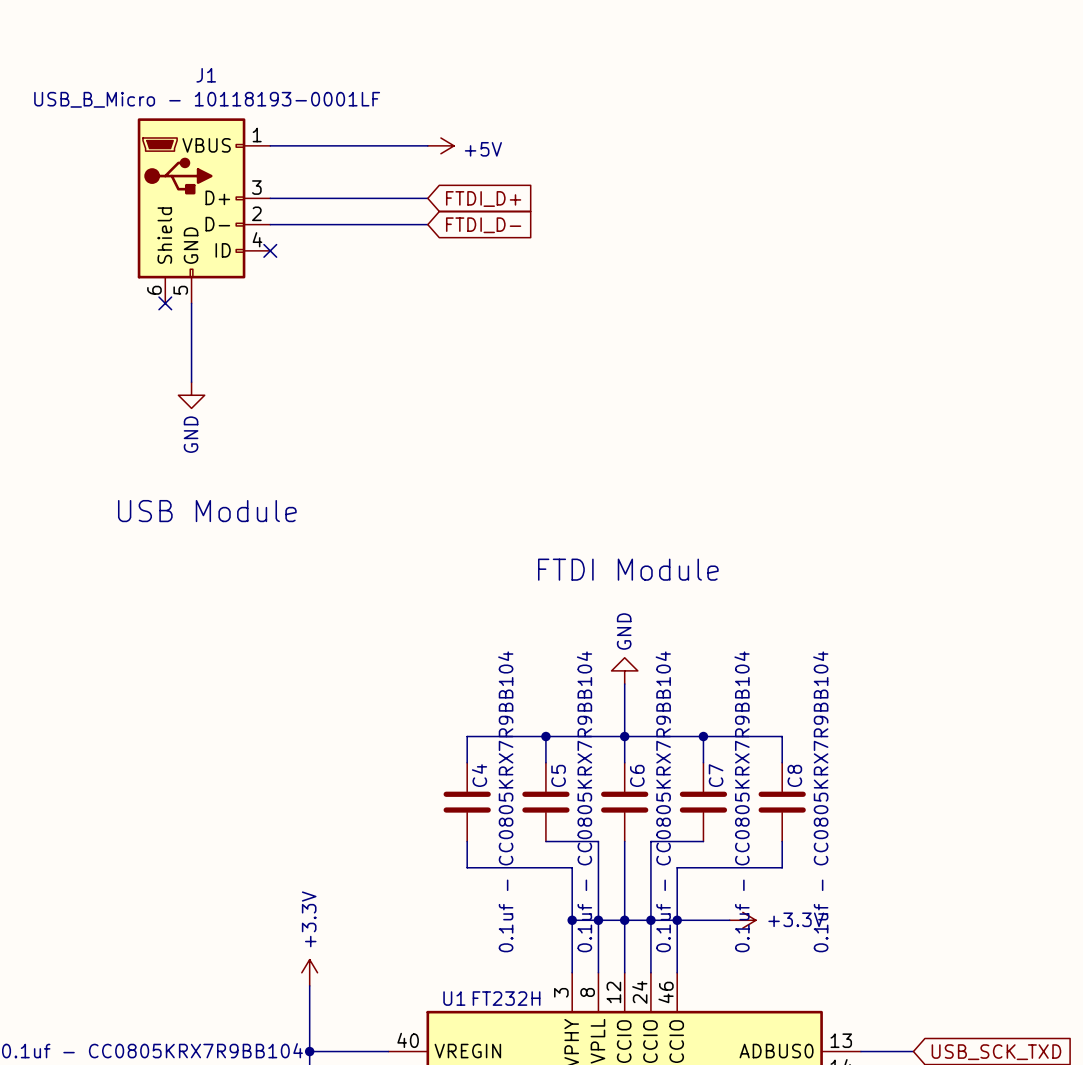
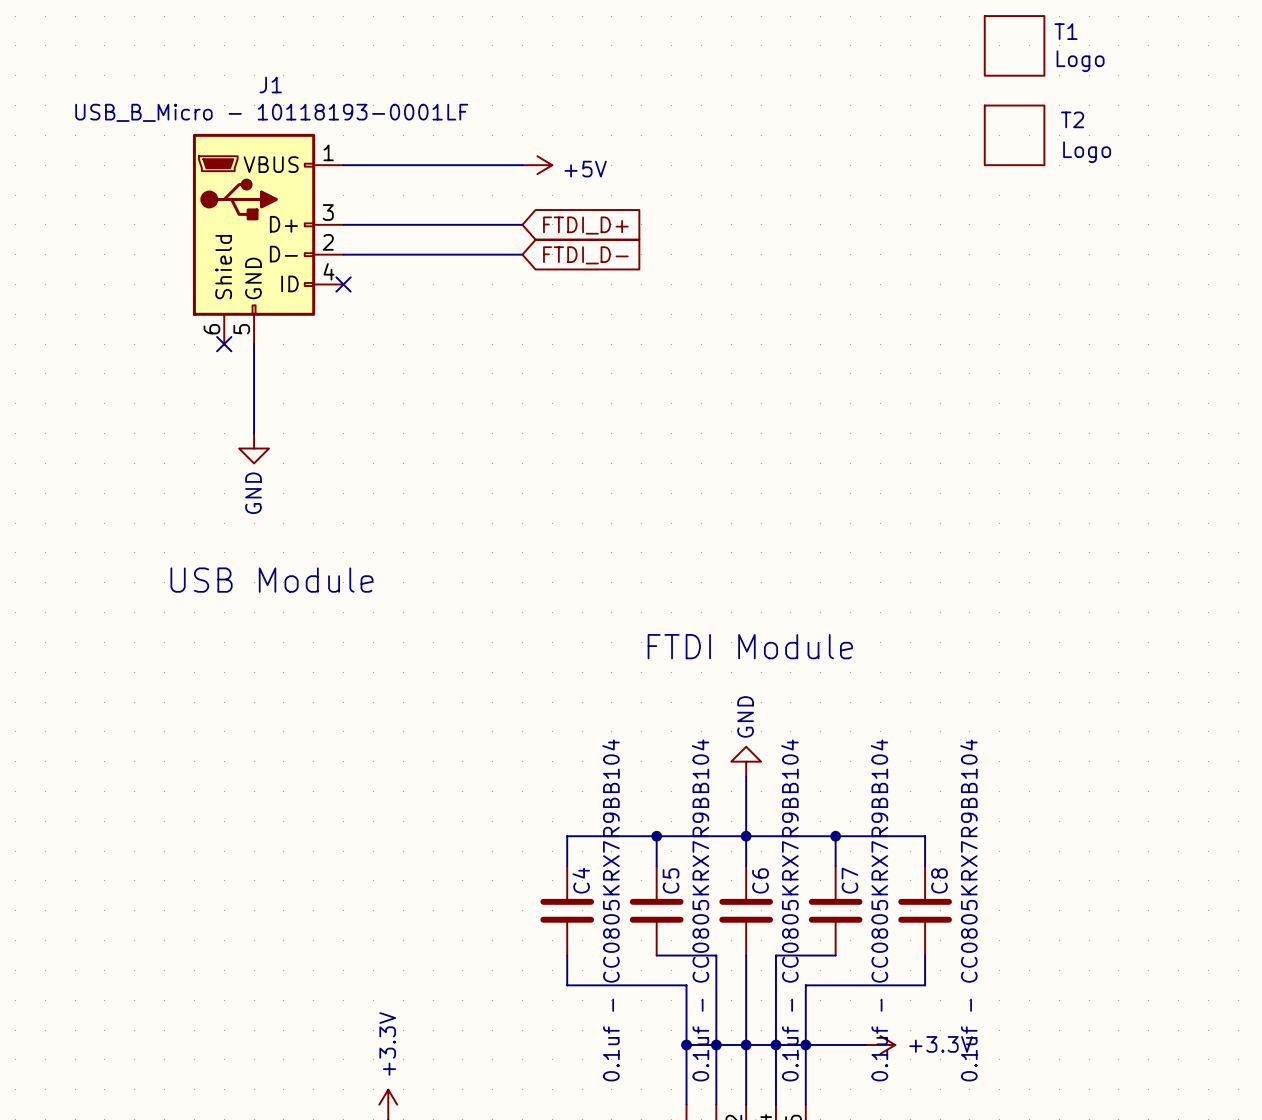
T1: none -> Logo (1014, 45)
T2: none -> Logo (1014, 135)

